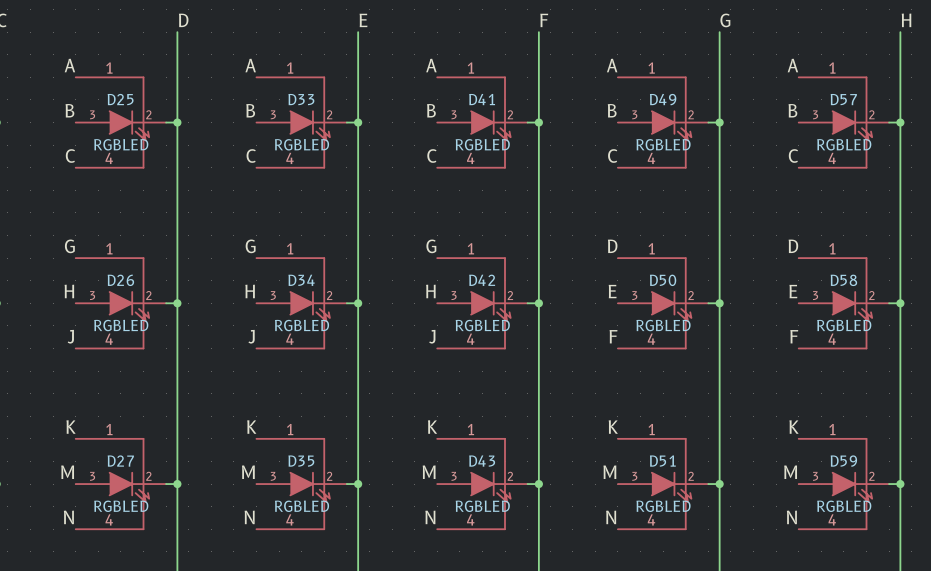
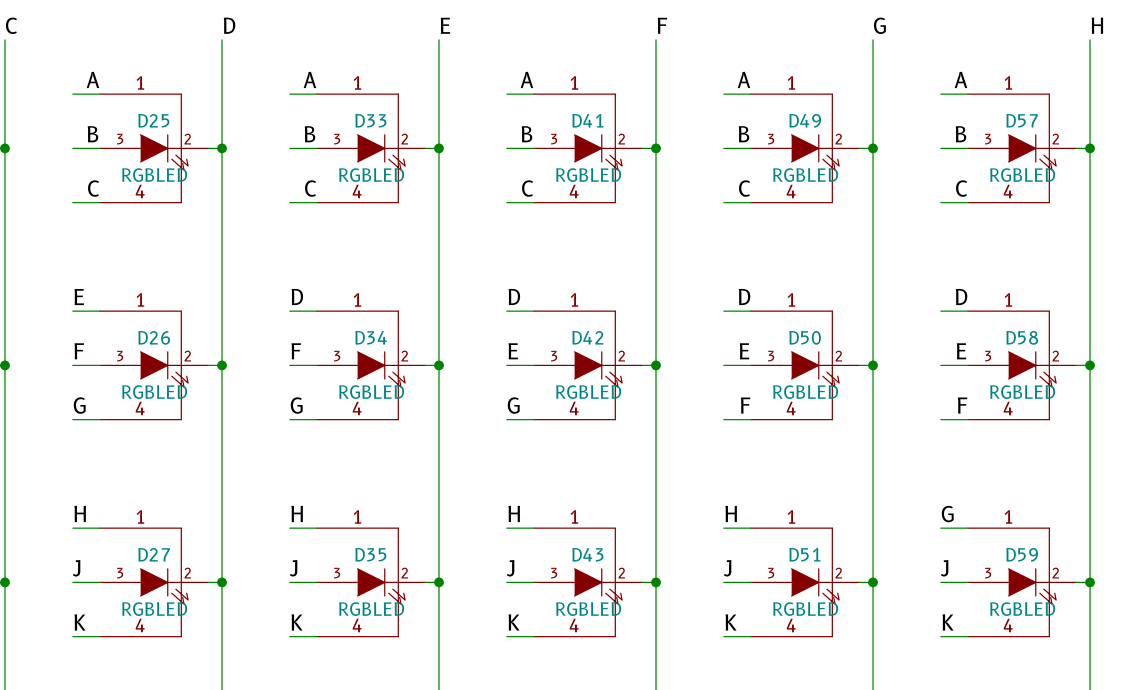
wire: none -> (72, 94) (99, 94)
wire: none -> (289, 94) (316, 94)
wire: none -> (506, 94) (533, 94)
wire: none -> (723, 94) (750, 94)
wire: none -> (940, 94) (967, 94)
wire: none -> (72, 148) (99, 148)
wire: none -> (289, 148) (316, 148)
wire: none -> (506, 148) (533, 148)
wire: none -> (723, 148) (750, 148)
wire: none -> (940, 148) (967, 148)
wire: none -> (72, 202) (99, 202)
wire: none -> (289, 202) (316, 202)
wire: none -> (506, 202) (533, 202)
wire: none -> (723, 202) (750, 202)
wire: none -> (940, 202) (967, 202)
label: none -> E (79, 297)
label: G (69, 246) -> none
label: none -> D (297, 296)
label: G (250, 246) -> none
label: none -> D (514, 296)
label: G (431, 246) -> none
wire: none -> (72, 311) (99, 311)
wire: none -> (289, 311) (316, 311)
wire: none -> (506, 311) (533, 311)
wire: none -> (723, 311) (750, 311)
wire: none -> (940, 311) (967, 311)
label: none -> F (79, 351)
label: H (69, 291) -> none
label: none -> F (296, 351)
label: H (250, 291) -> none
label: none -> E (513, 351)
label: H (430, 291) -> none
wire: none -> (72, 365) (99, 365)
wire: none -> (289, 365) (316, 365)
wire: none -> (506, 365) (533, 365)
wire: none -> (723, 365) (750, 365)
wire: none -> (940, 365) (967, 365)
label: none -> G (79, 405)
label: J (70, 336) -> none
label: none -> G (296, 405)
label: J (251, 336) -> none
label: none -> G (513, 405)
label: J (432, 336) -> none
wire: none -> (72, 419) (99, 419)
wire: none -> (289, 419) (316, 419)
wire: none -> (506, 419) (533, 419)
wire: none -> (723, 419) (750, 419)
wire: none -> (940, 419) (967, 419)
label: none -> H (80, 513)
label: K (71, 427) -> none
label: none -> H (297, 513)
label: K (251, 427) -> none
label: none -> H (514, 513)
label: K (432, 427) -> none
label: none -> H (731, 513)
label: K (613, 427) -> none
label: none -> G (947, 514)
label: K (794, 427) -> none
wire: none -> (72, 528) (99, 528)
wire: none -> (289, 528) (316, 528)
wire: none -> (506, 528) (533, 528)
wire: none -> (723, 528) (750, 528)
wire: none -> (940, 528) (967, 528)
label: none -> J (76, 568)
label: M (67, 472) -> none
label: none -> J (293, 568)
label: M (248, 472) -> none
label: none -> J (510, 568)
label: M (429, 472) -> none
label: none -> J (727, 568)
label: M (609, 472) -> none
label: none -> J (944, 568)
label: M (790, 472) -> none
wire: none -> (72, 582) (99, 582)
wire: none -> (289, 582) (316, 582)
wire: none -> (506, 582) (533, 582)
wire: none -> (723, 582) (750, 582)
wire: none -> (940, 582) (967, 582)
label: none -> K (80, 622)
label: N (68, 517) -> none
label: none -> K (297, 622)
label: N (249, 517) -> none
label: none -> K (514, 622)
label: N (430, 517) -> none
label: none -> K (731, 622)
label: N (611, 517) -> none
label: none -> K (948, 622)
label: N (791, 517) -> none
wire: none -> (72, 636) (99, 636)
wire: none -> (289, 636) (316, 636)
wire: none -> (506, 636) (533, 636)
wire: none -> (723, 636) (750, 636)
wire: none -> (940, 636) (967, 636)

